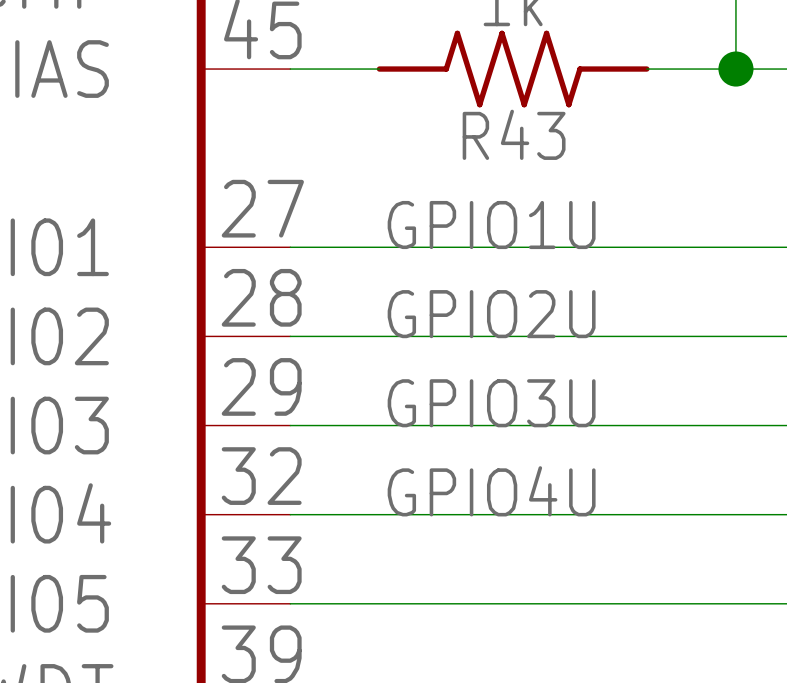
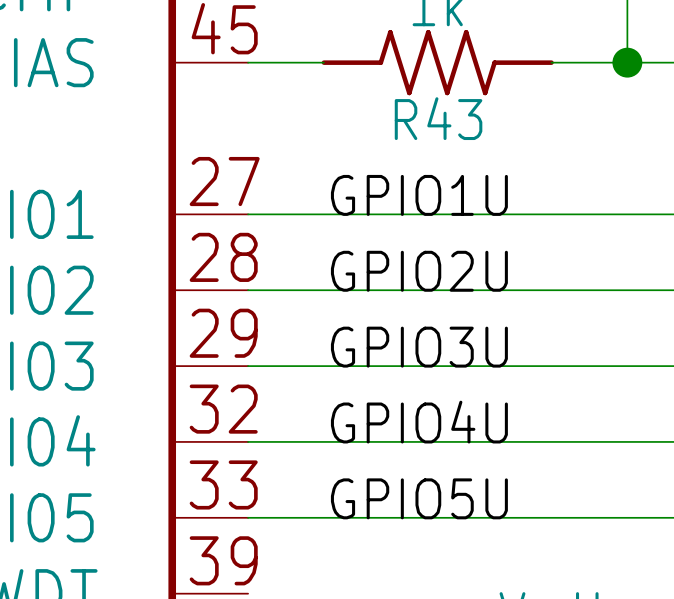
label: none -> GPIO5U (419, 498)

